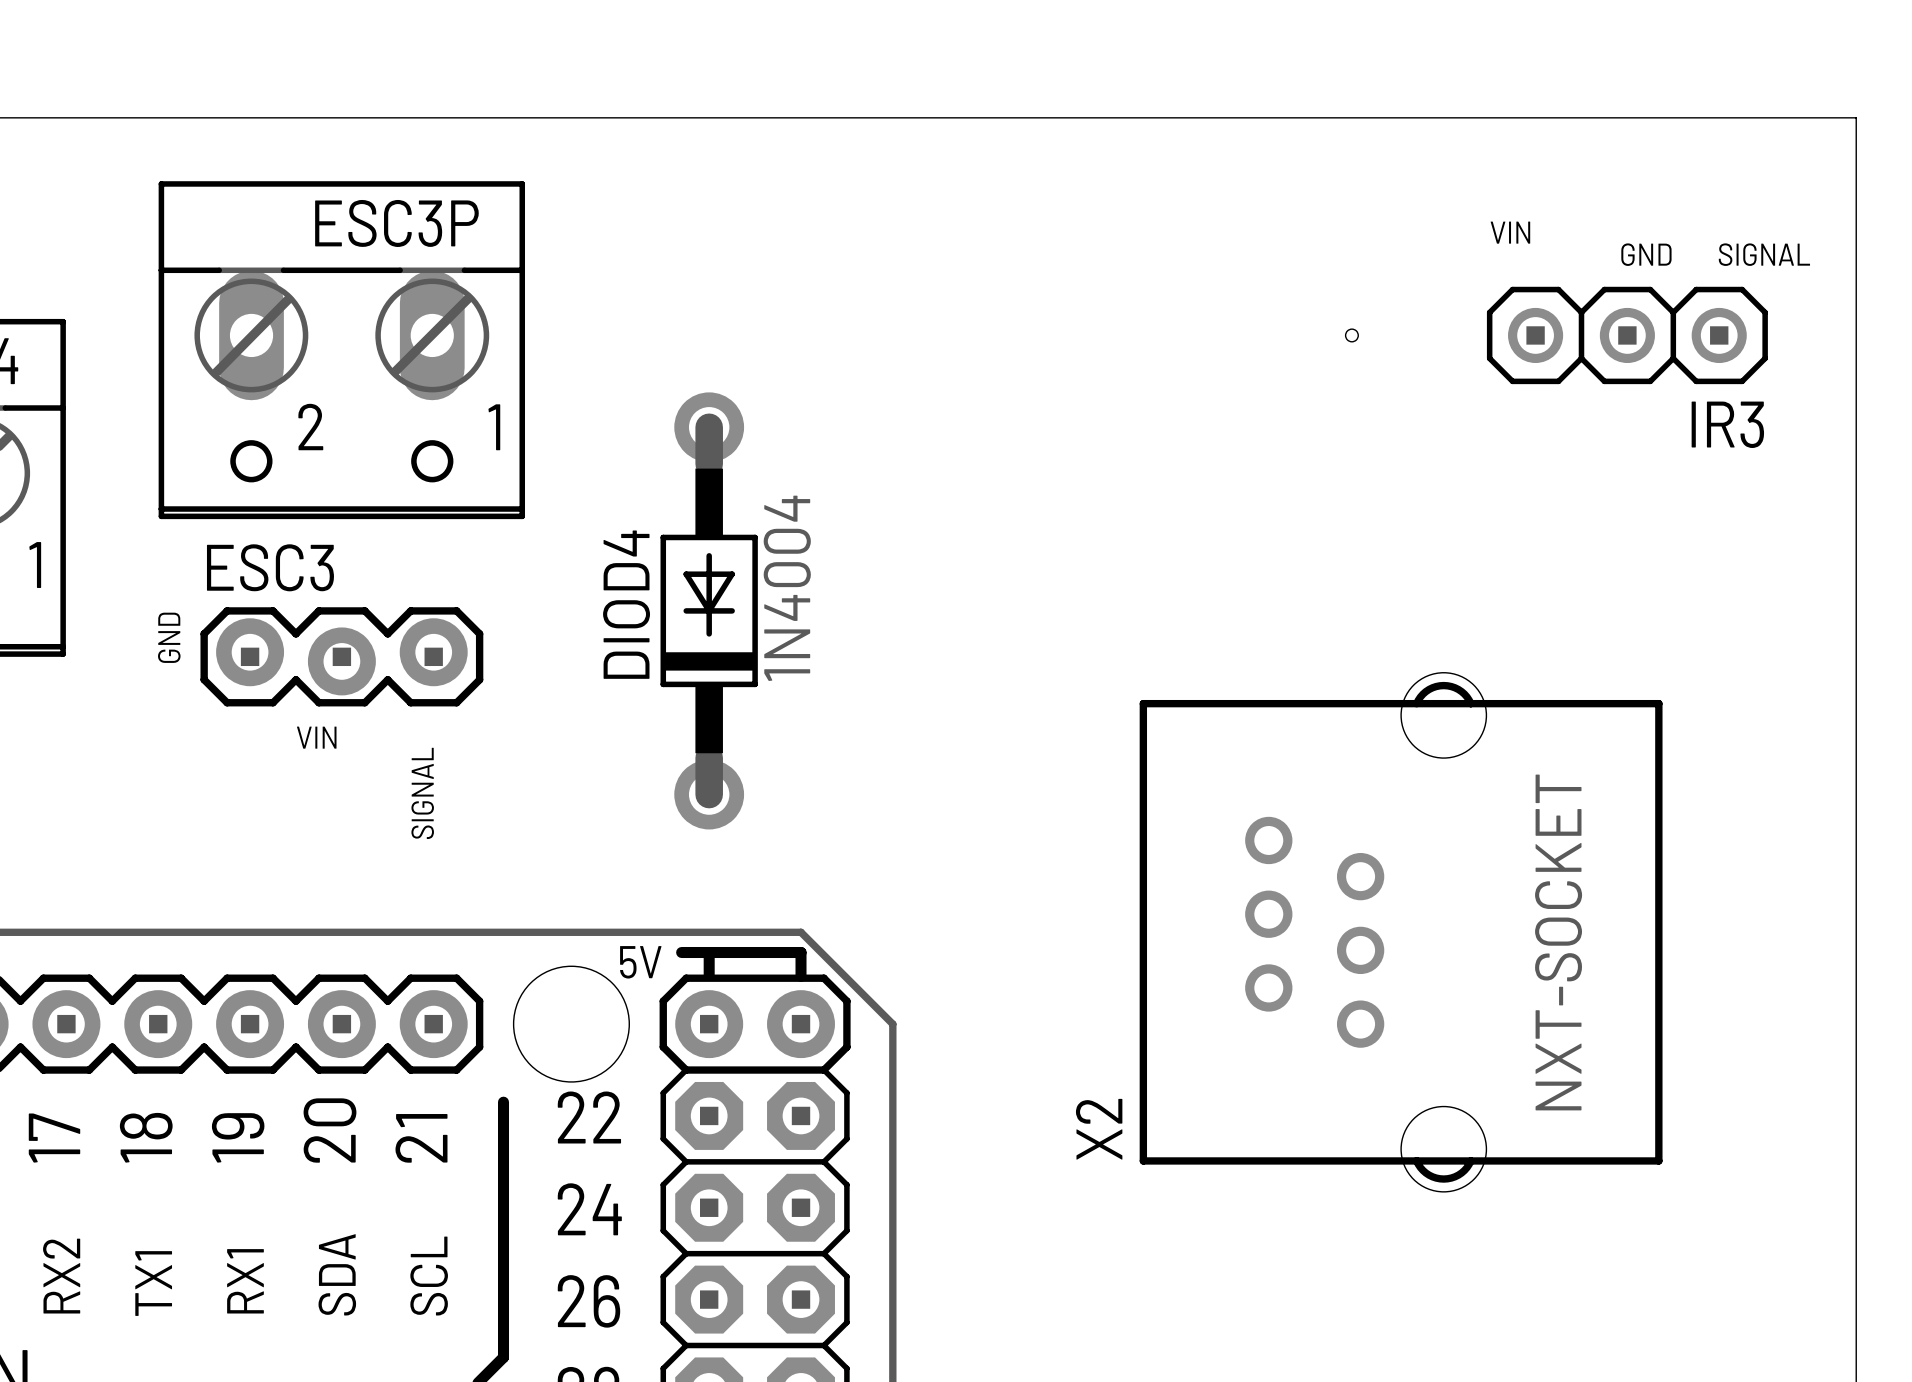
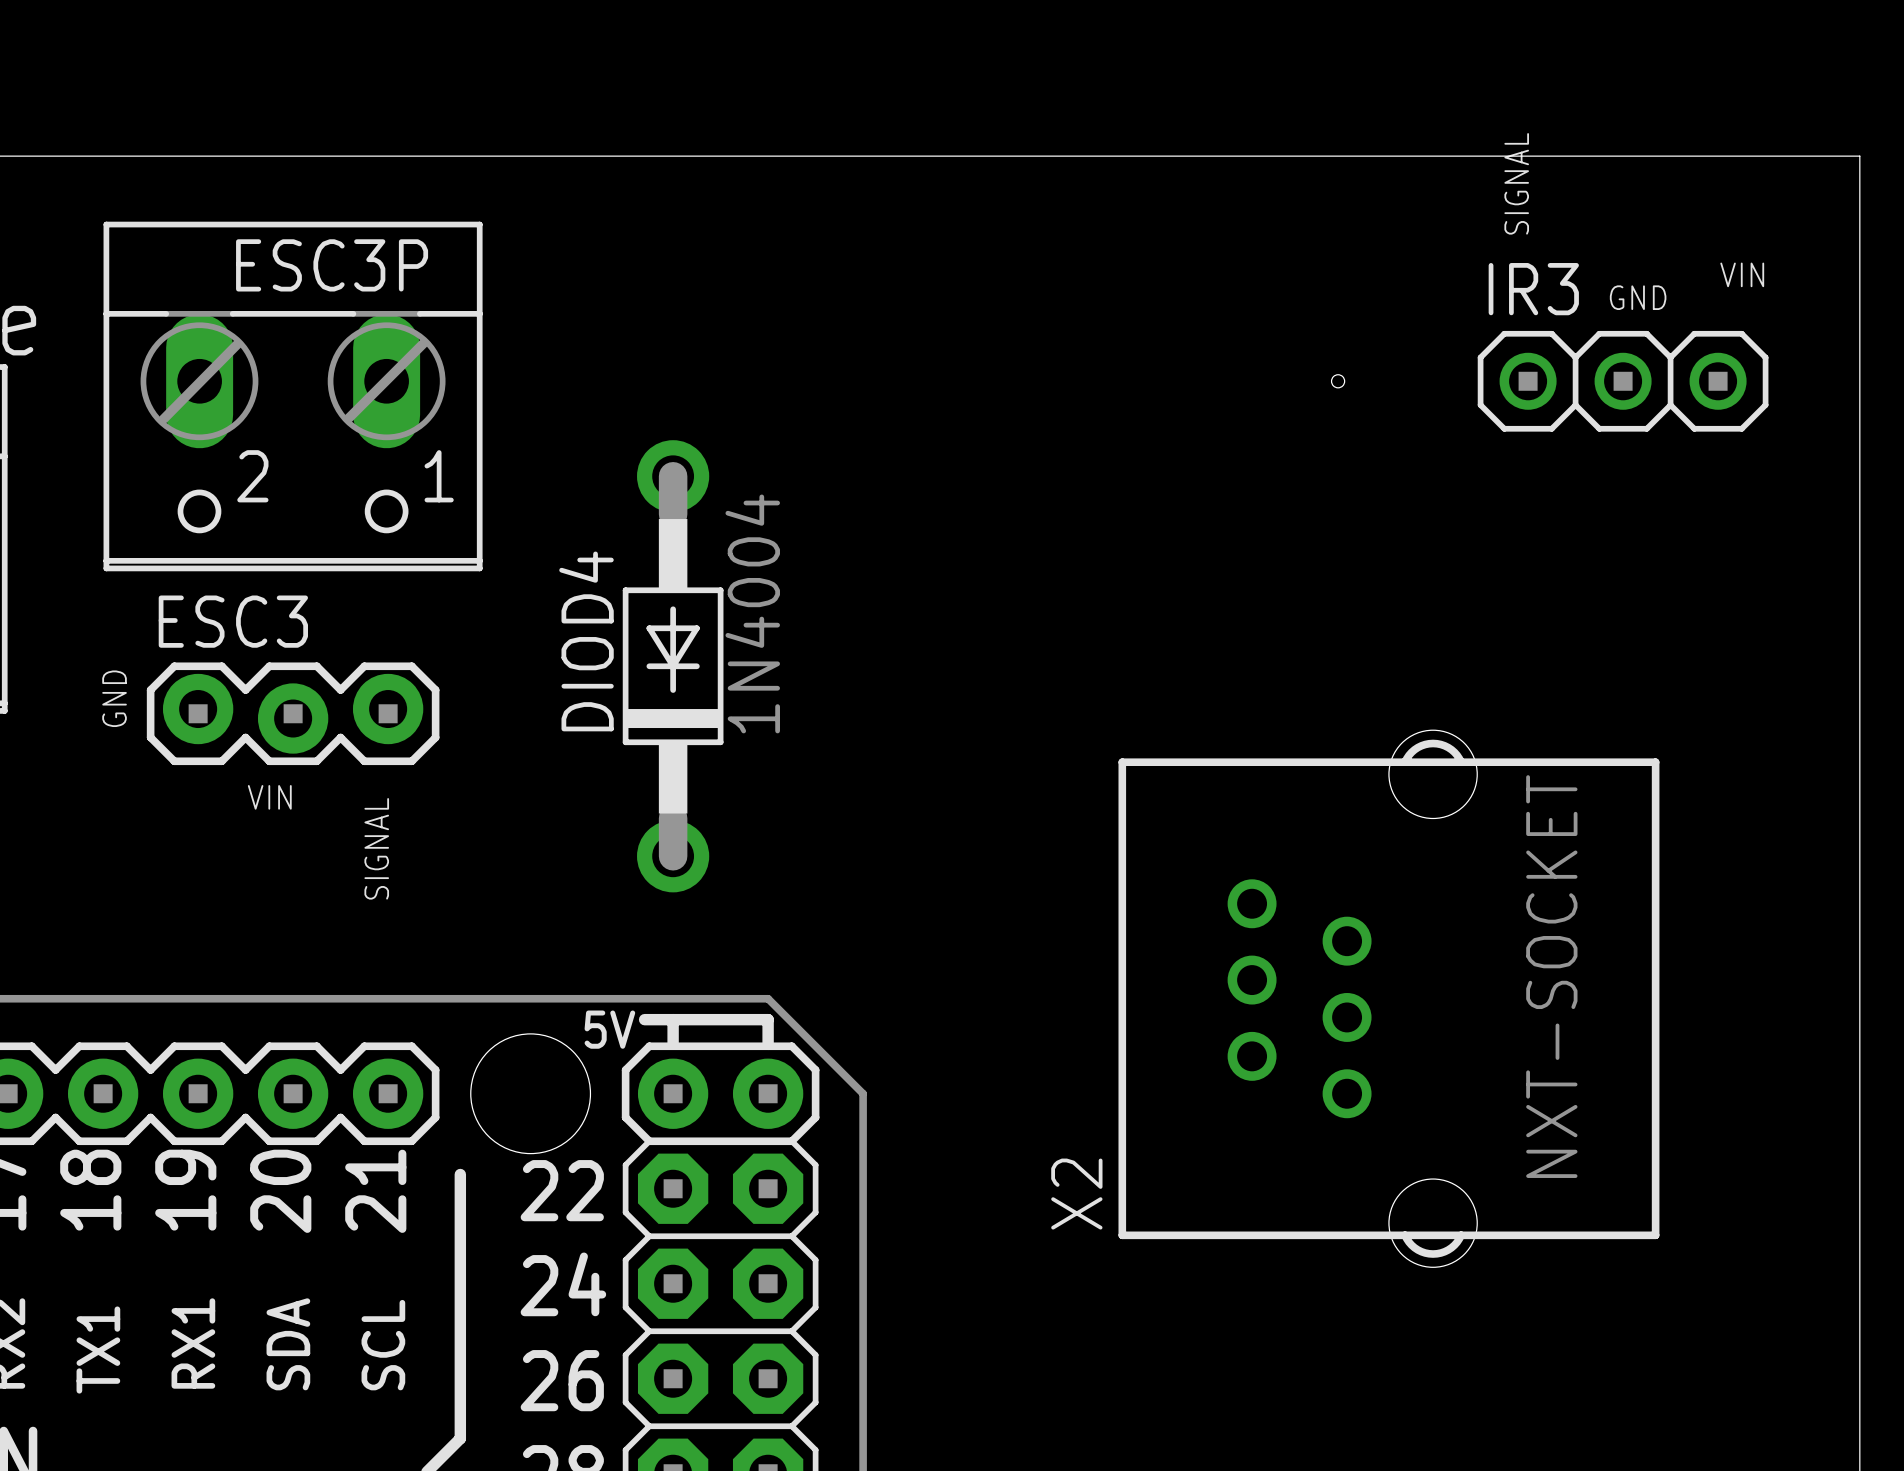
text position: VIN (1510, 232) -> VIN (1742, 274)
text rotation: 0° (1764, 254) -> 90° counterclockwise (1516, 183)
text position: SIGNAL (1764, 254) -> SIGNAL (1516, 183)
IR3 name position: IR3 (1727, 424) -> IR3 (1533, 289)

